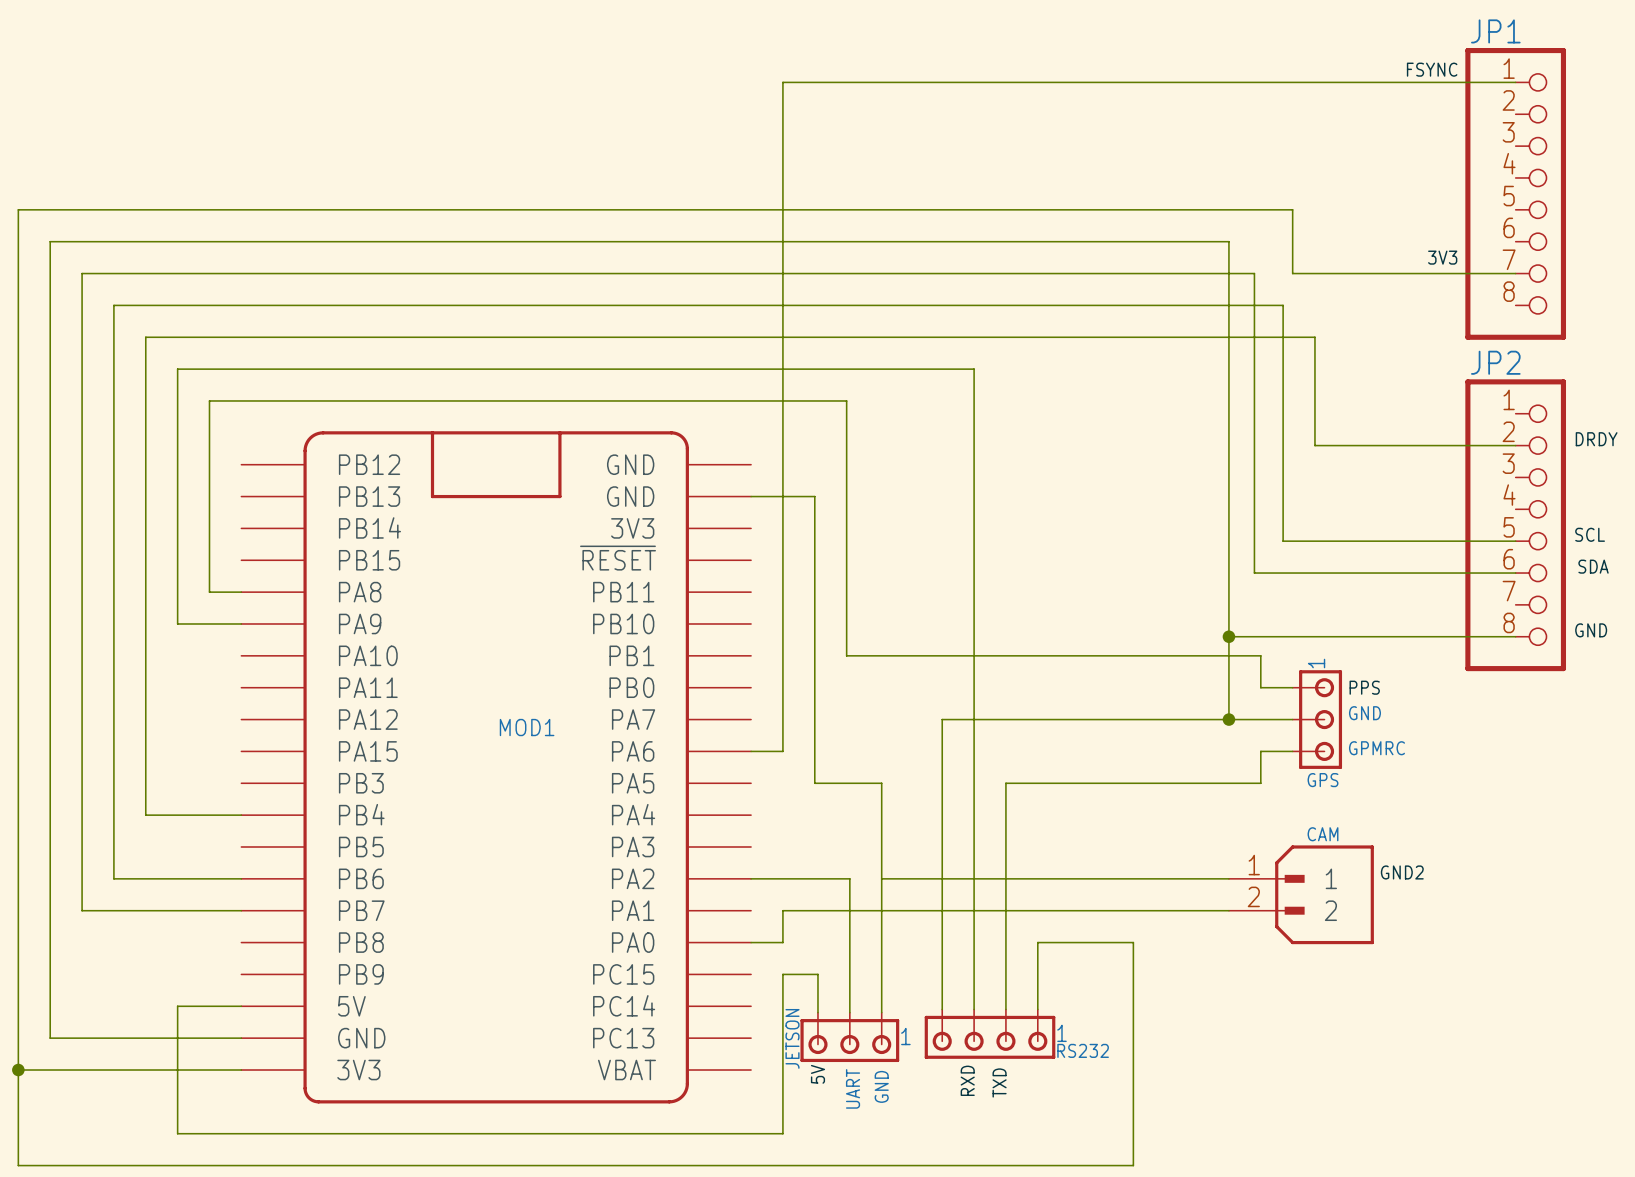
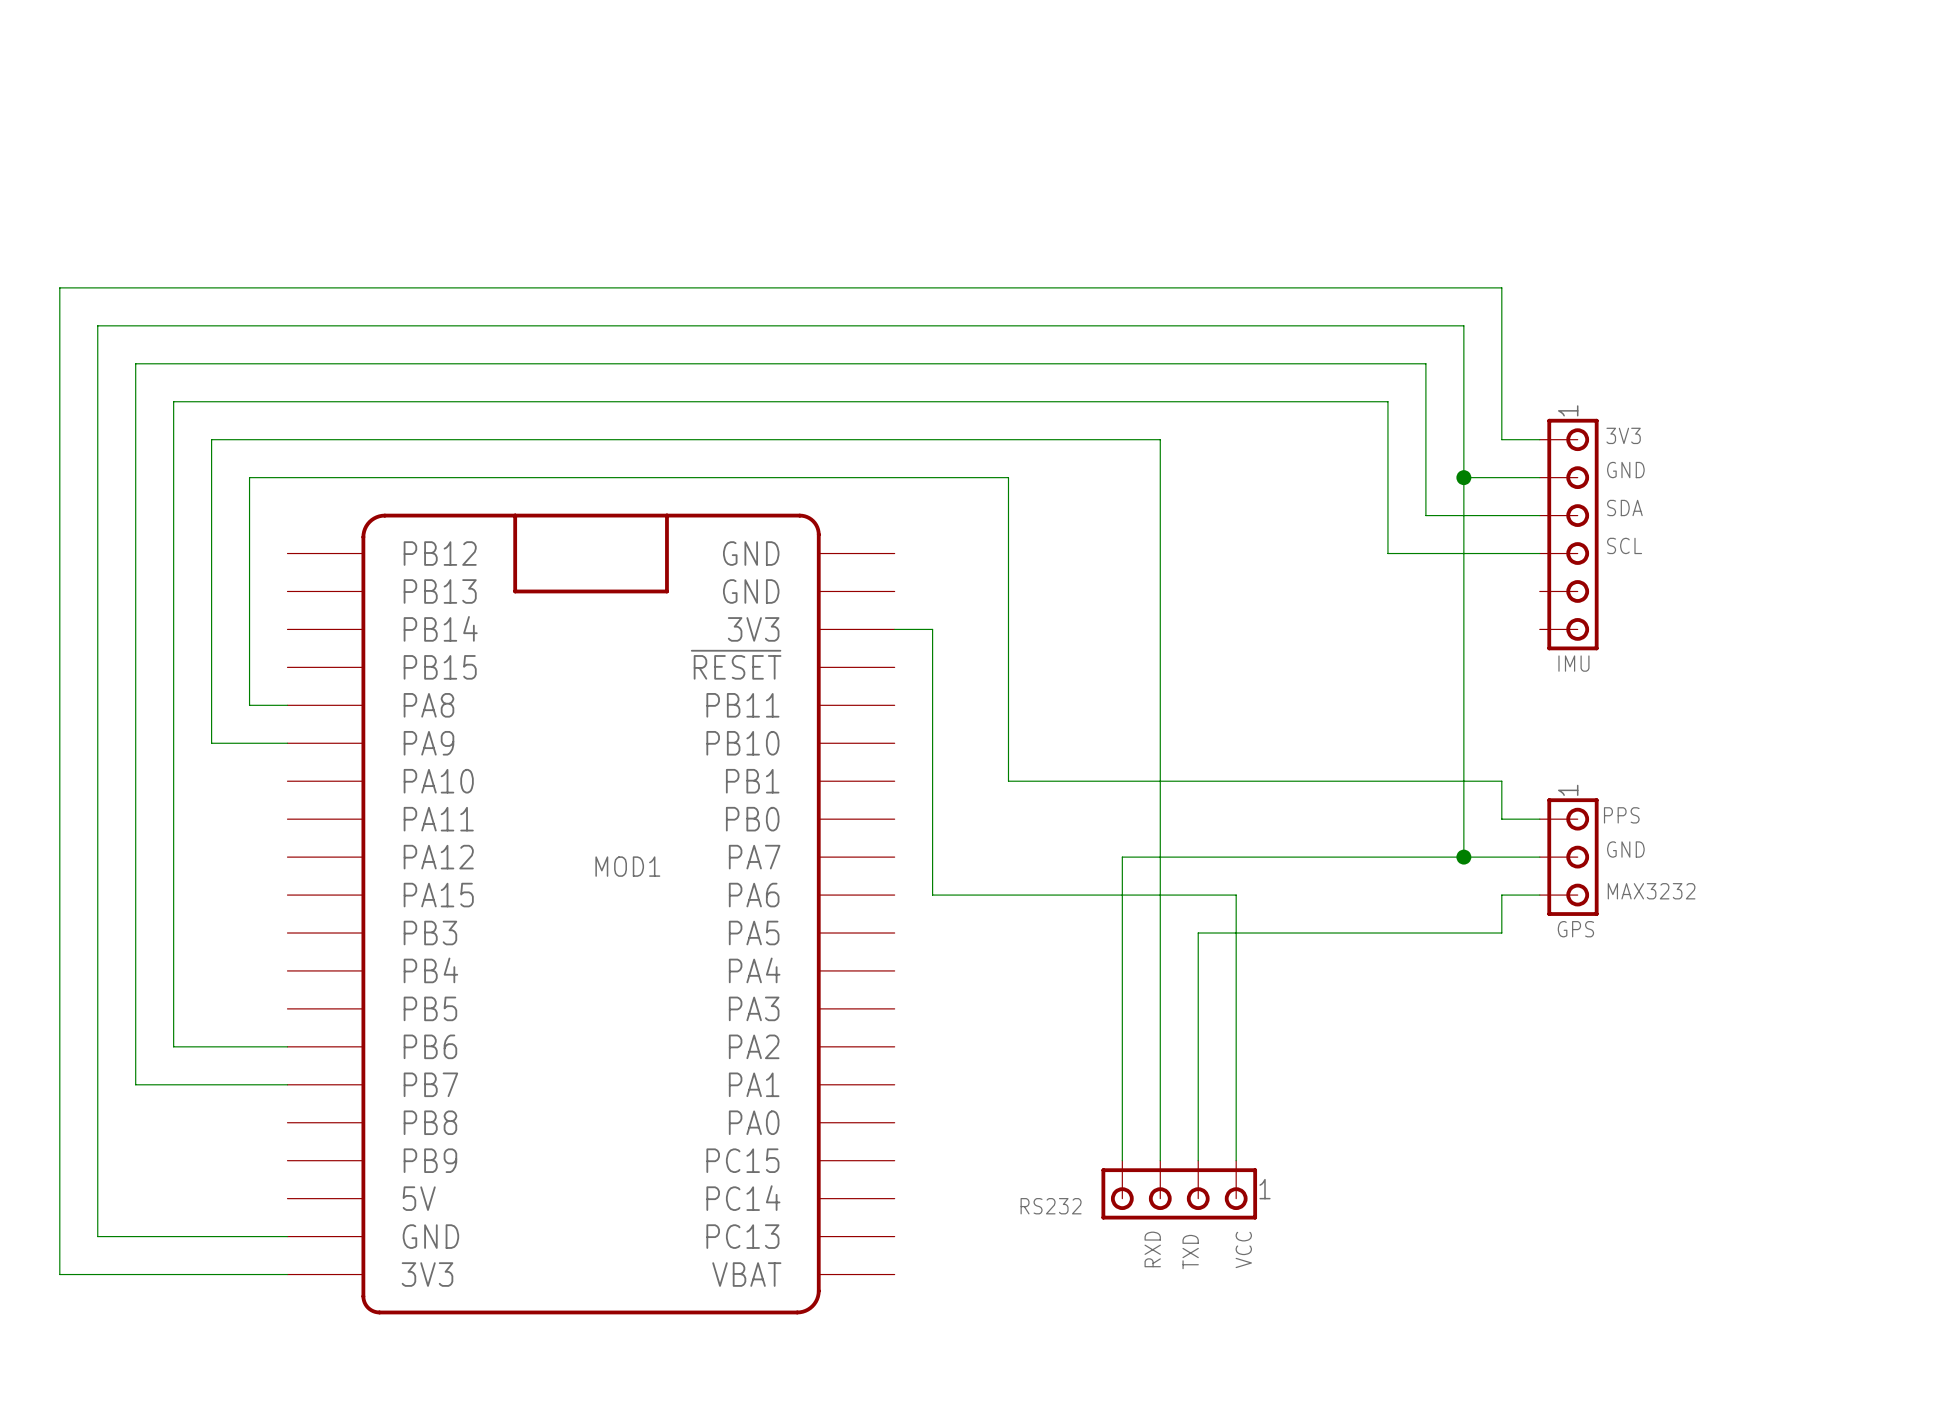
label: FSYNC (1432, 69) -> none
wire: (1515, 82) (782, 82) (782, 528) -> (894, 629) (932, 629)
JP1: (1515, 193) -> none
wire: (1228, 241) (1228, 273) (1254, 273) (1254, 573) (1515, 573) -> (1463, 287) (1501, 287) (1501, 439) (1539, 439)
label position: 3V3 (1442, 257) -> 3V3 (1623, 435)
wire: (1515, 273) (1292, 273) (1292, 209) (18, 209) (18, 1165) (1133, 1165) (1133, 942) (1037, 942) -> none
wire: (1197, 305) (1283, 305) (1283, 541) (1515, 541) -> (1425, 363) (1425, 515) (1539, 515)
wire: (1165, 337) (1314, 337) (1314, 445) (1515, 445) -> (1387, 401) (1387, 553) (1539, 553)
label: none -> GND (1625, 470)
wire: none -> (1463, 477) (1539, 477)
junction: none -> (1463, 477)
label: DRDY (1596, 439) -> none
IMU: none -> (1569, 534)
wire: (751, 496) (814, 496) (814, 783) (881, 783) (881, 1012) -> none
JP2: (1515, 525) -> none
label position: SCL (1590, 534) -> SCL (1624, 545)
label position: SDA (1593, 566) -> SDA (1624, 507)
label: GND (1591, 630) -> none
wire: (1228, 636) (1515, 636) -> none
junction: (1228, 636) -> none
text: none -> PPS (1621, 815)
label: PPS (1364, 687) -> none
text: GPMRC (1376, 748) -> MAX3232 (1651, 891)
wire: (751, 751) (782, 751) -> (1236, 1122) (1236, 895) (932, 895)
wire: (145, 815) (241, 815) -> (173, 970) (173, 1046)
label: GND2 (1402, 872) -> none
wire: (113, 878) (145, 878) -> (135, 1046) (135, 1084)
wire: (751, 878) (849, 878) (849, 1012) -> none
wire: (881, 878) (1228, 878) -> none
CAM: (1301, 894) -> none
wire: (82, 910) (113, 910) -> (97, 1084) (97, 1236)
wire: (1228, 910) (782, 910) (782, 942) (751, 942) -> none
wire: (241, 1006) (177, 1006) (177, 1133) (782, 1133) (782, 974) (817, 974) (817, 1012) -> none
RS232 position: (990, 1034) -> (1179, 1190)
JETSON: (849, 1037) -> none
wire: (50, 1038) (82, 1038) -> (59, 1236) (59, 1274)
label: none -> VCC (1243, 1249)
RS232 name position: RS232 (1083, 1050) -> RS232 (1051, 1206)
wire: (18, 1070) (50, 1070) -> none
junction: (18, 1070) -> none
label: 5V (817, 1074) -> none
label position: RXD (967, 1080) -> RXD (1152, 1249)
label position: TXD (999, 1082) -> TXD (1190, 1252)
text: GND (881, 1086) -> none
text: UART (853, 1088) -> none

